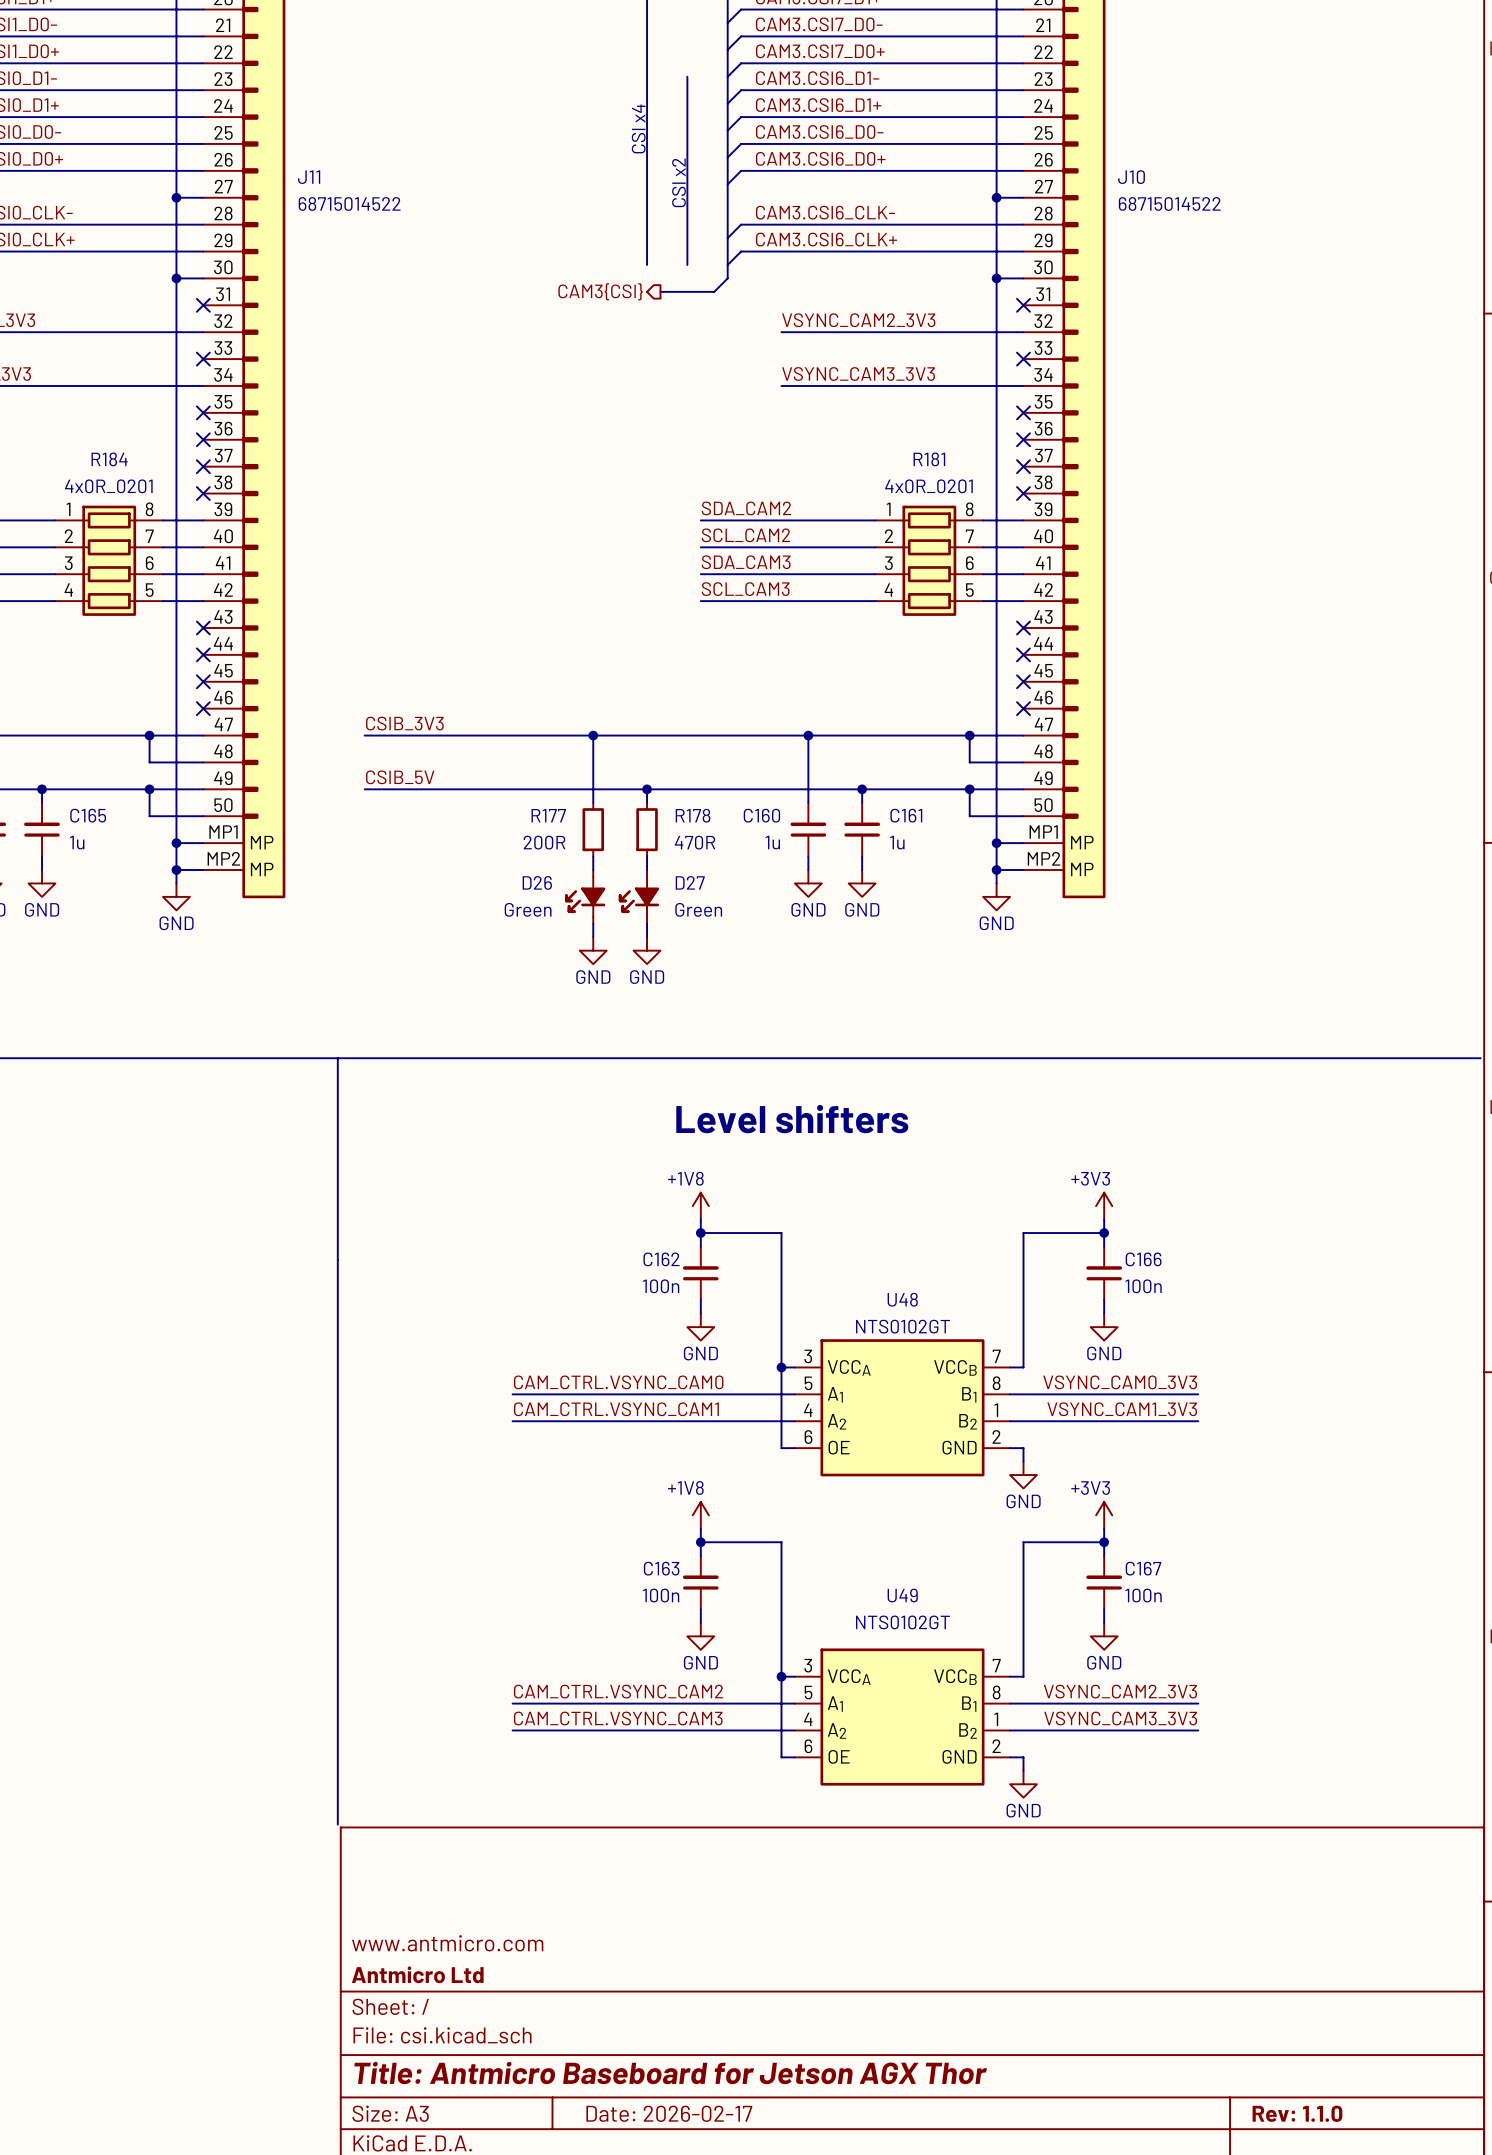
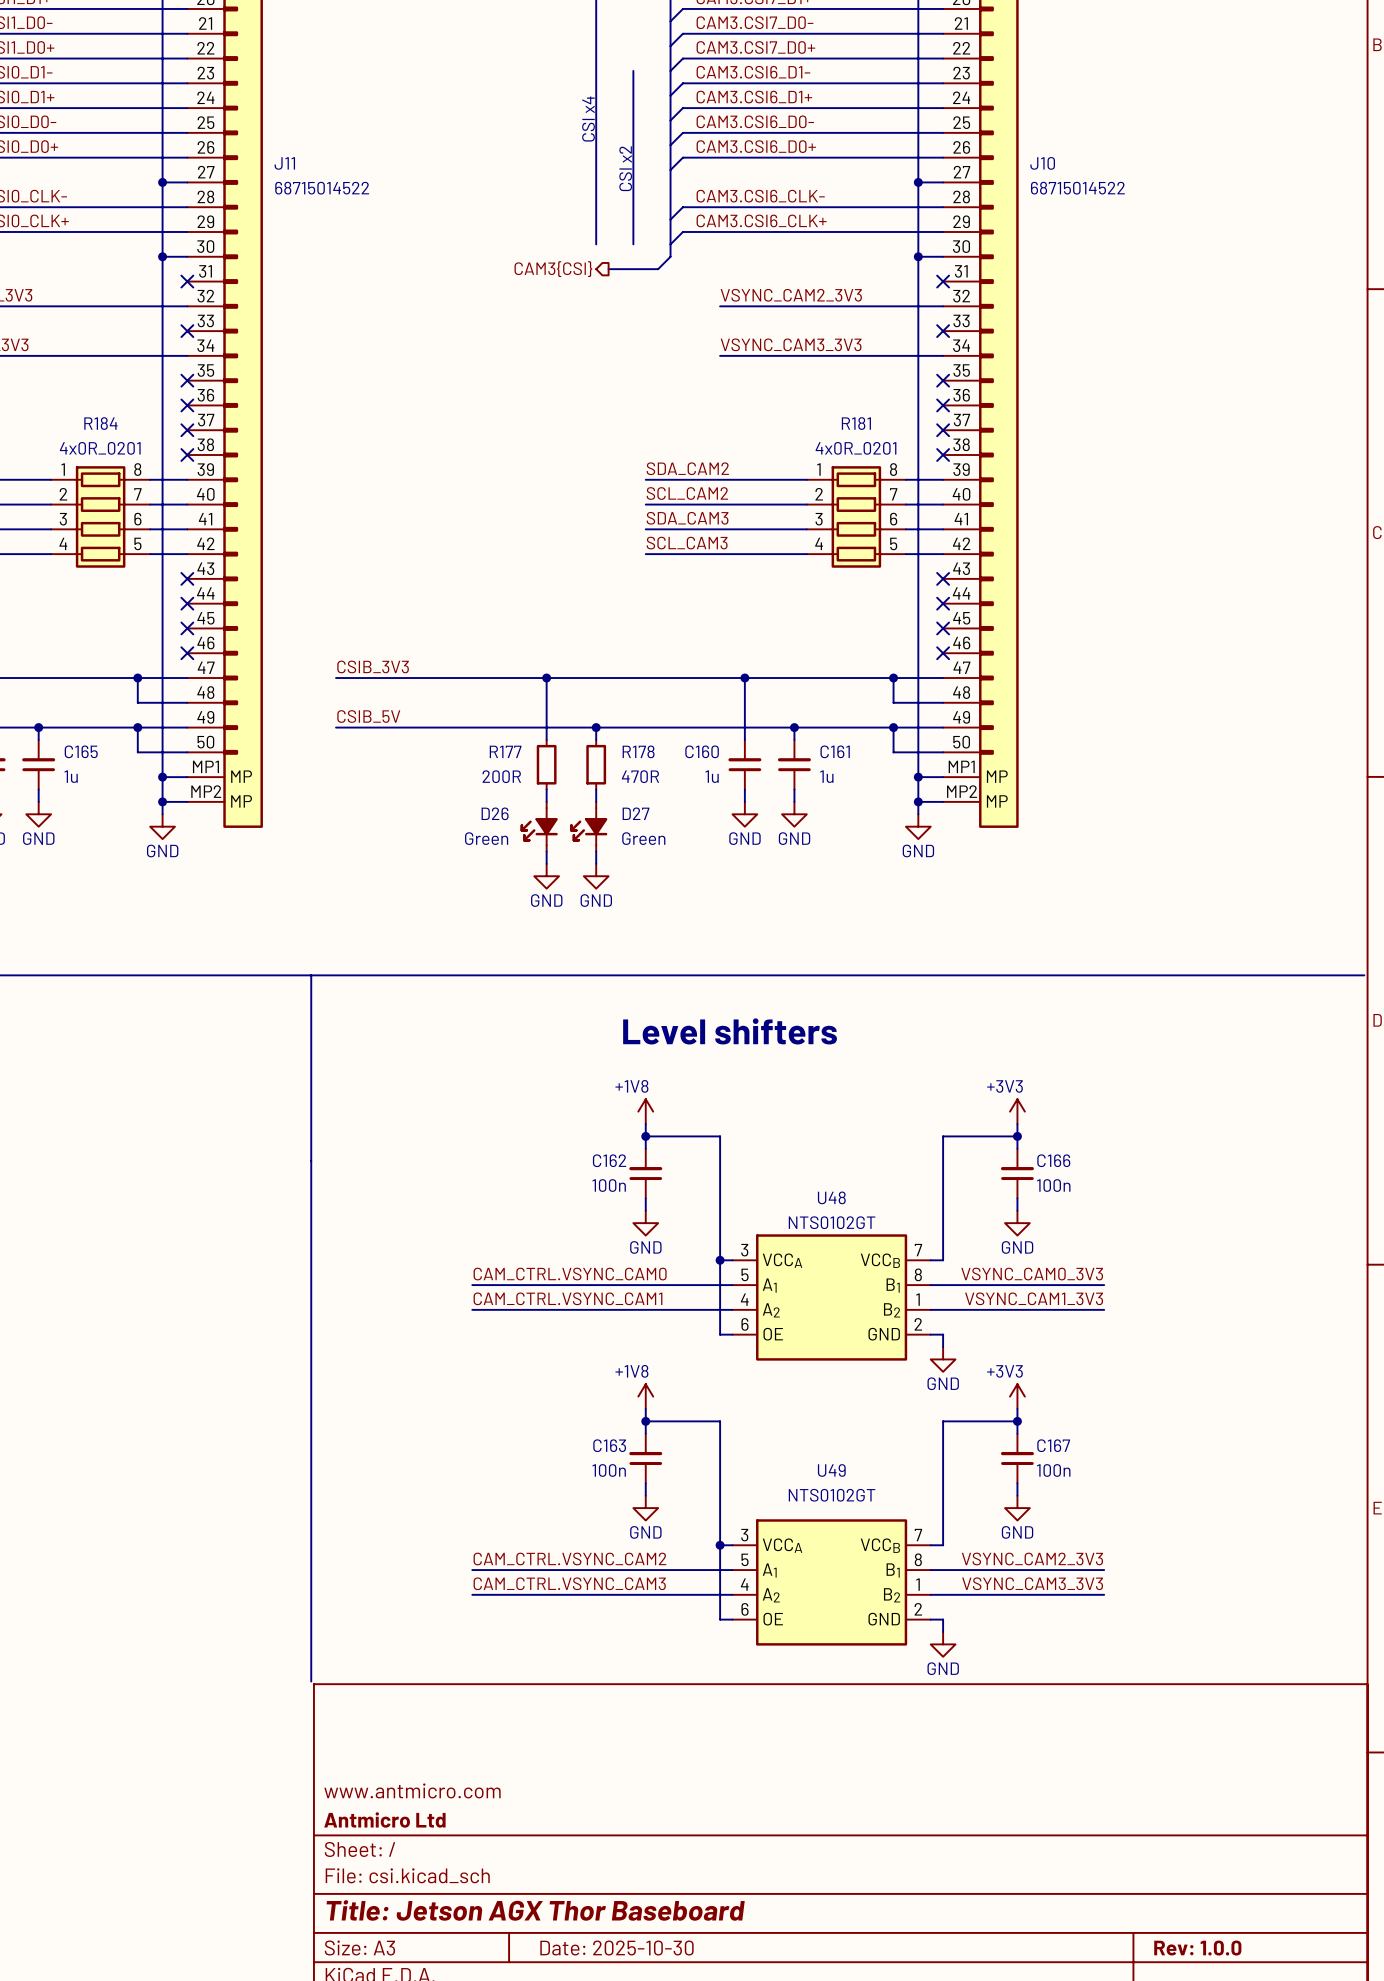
title block: Title: Antmicro Baseboard for Jetson AGX Thor (670, 2073) -> Title: Jetson AGX Thor Baseboard (535, 1910)
title block: Date: 2026-02-17 (669, 2113) -> Date: 2025-10-30 (616, 1948)
title block: Rev: 1.1.0 (1297, 2113) -> Rev: 1.0.0 (1197, 1948)

